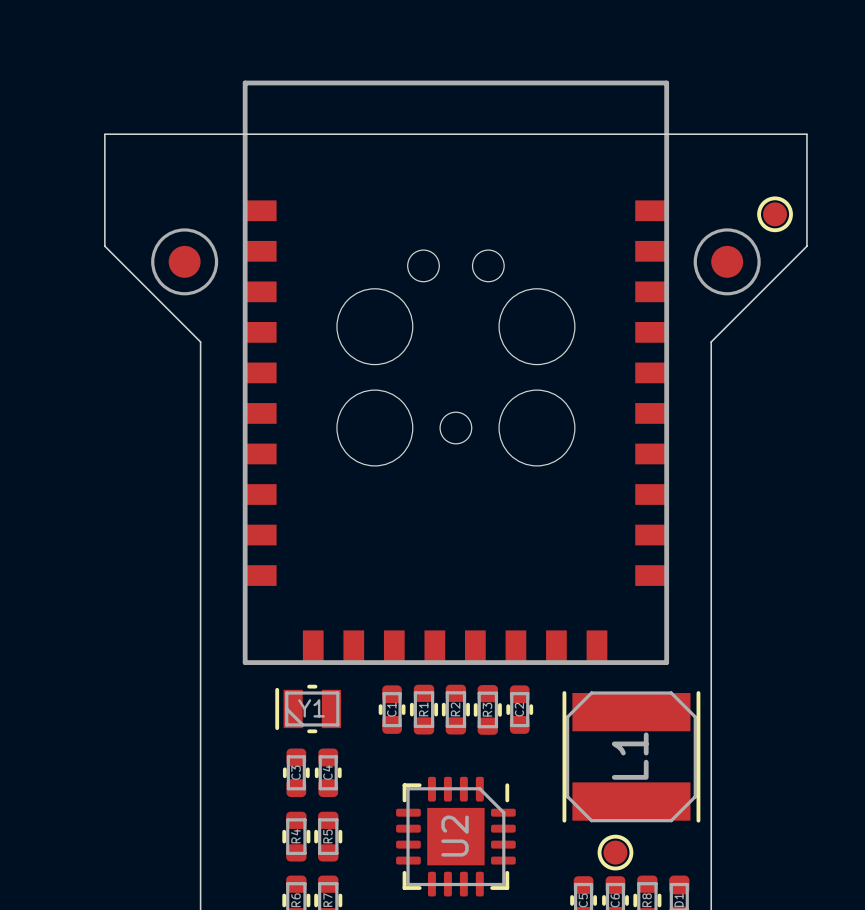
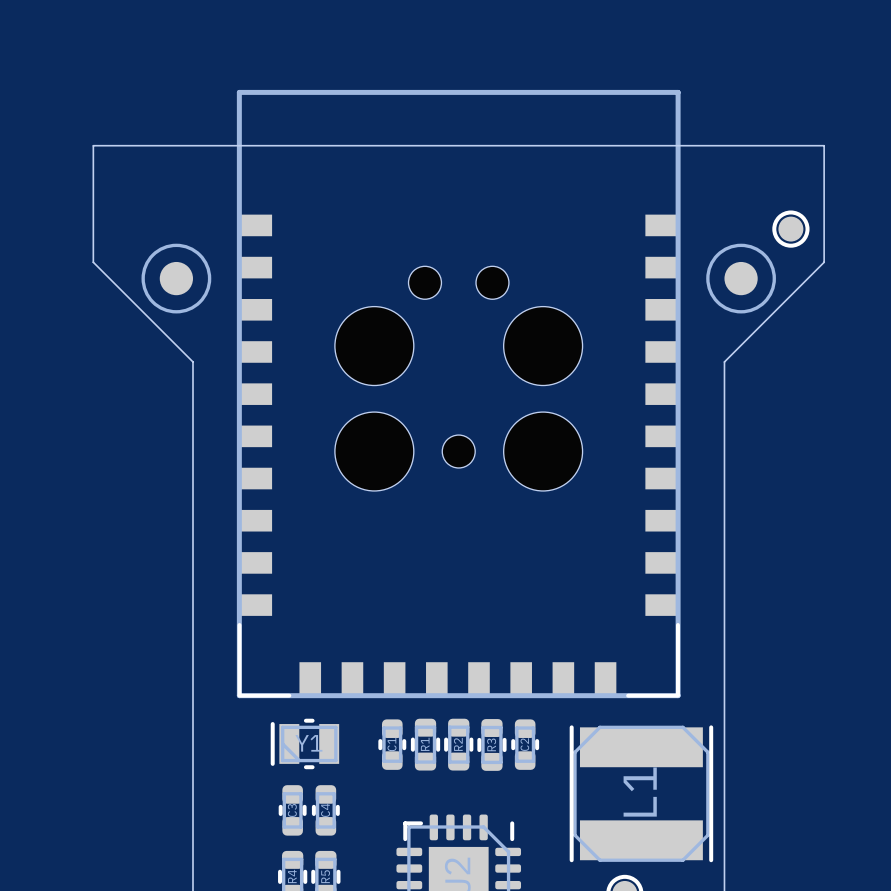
part footprint: [242, 80, 670, 665] -> [236, 89, 681, 699]

